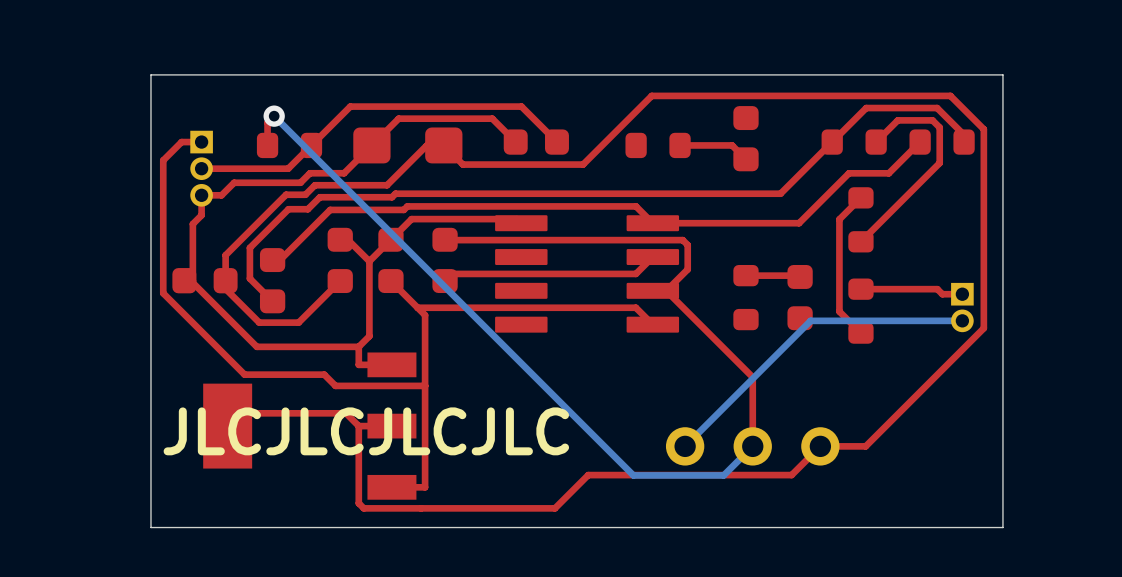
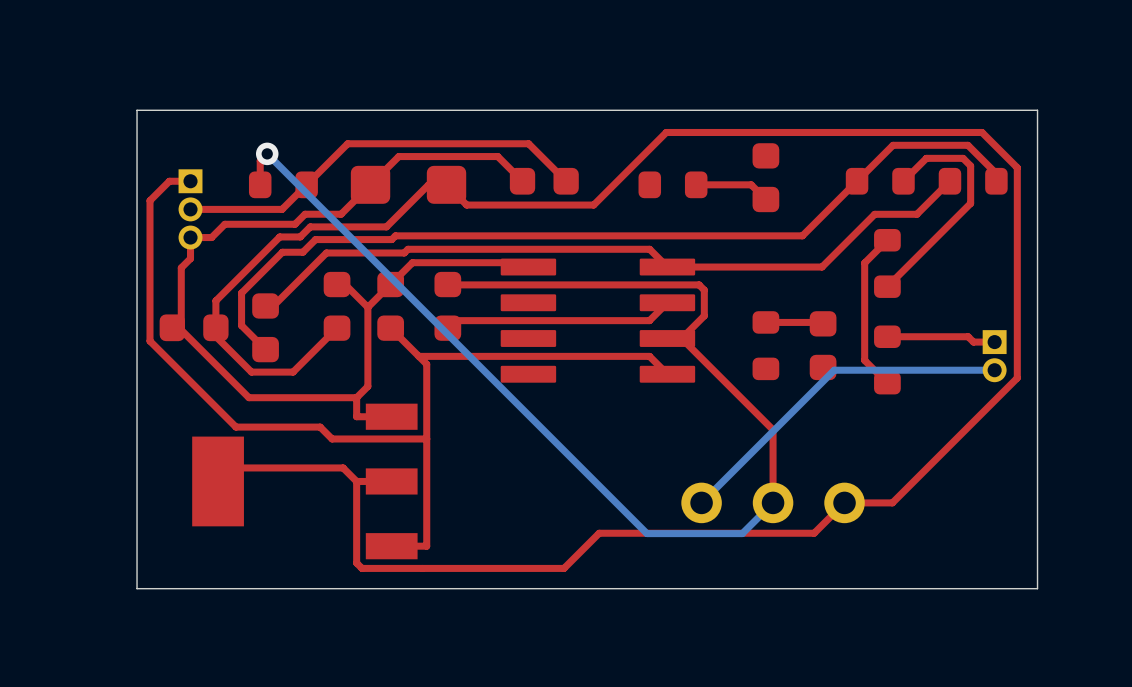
text: JLCJLCJLCJLC (366, 431) -> none

